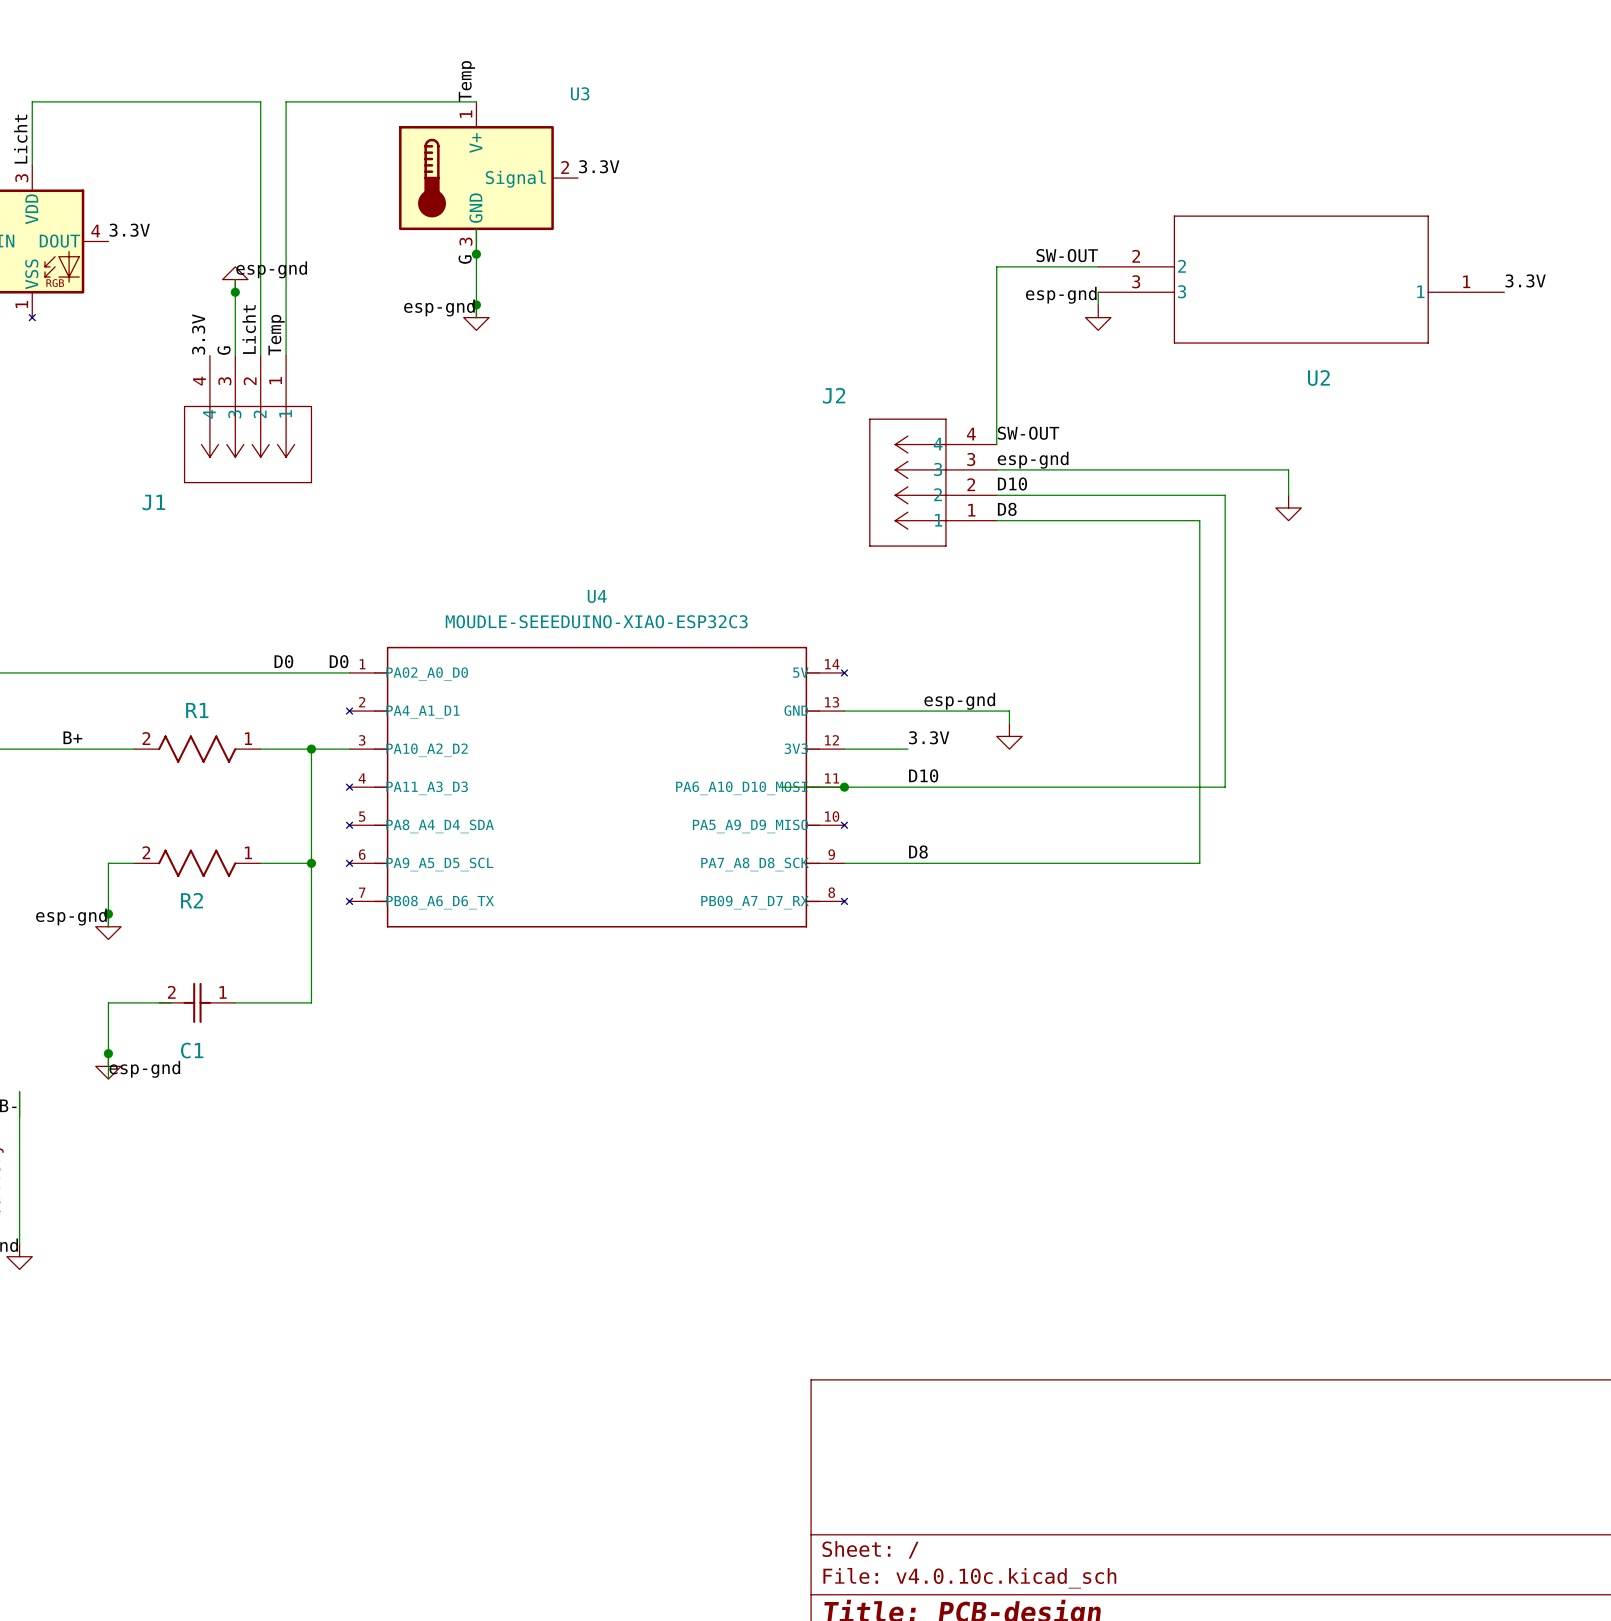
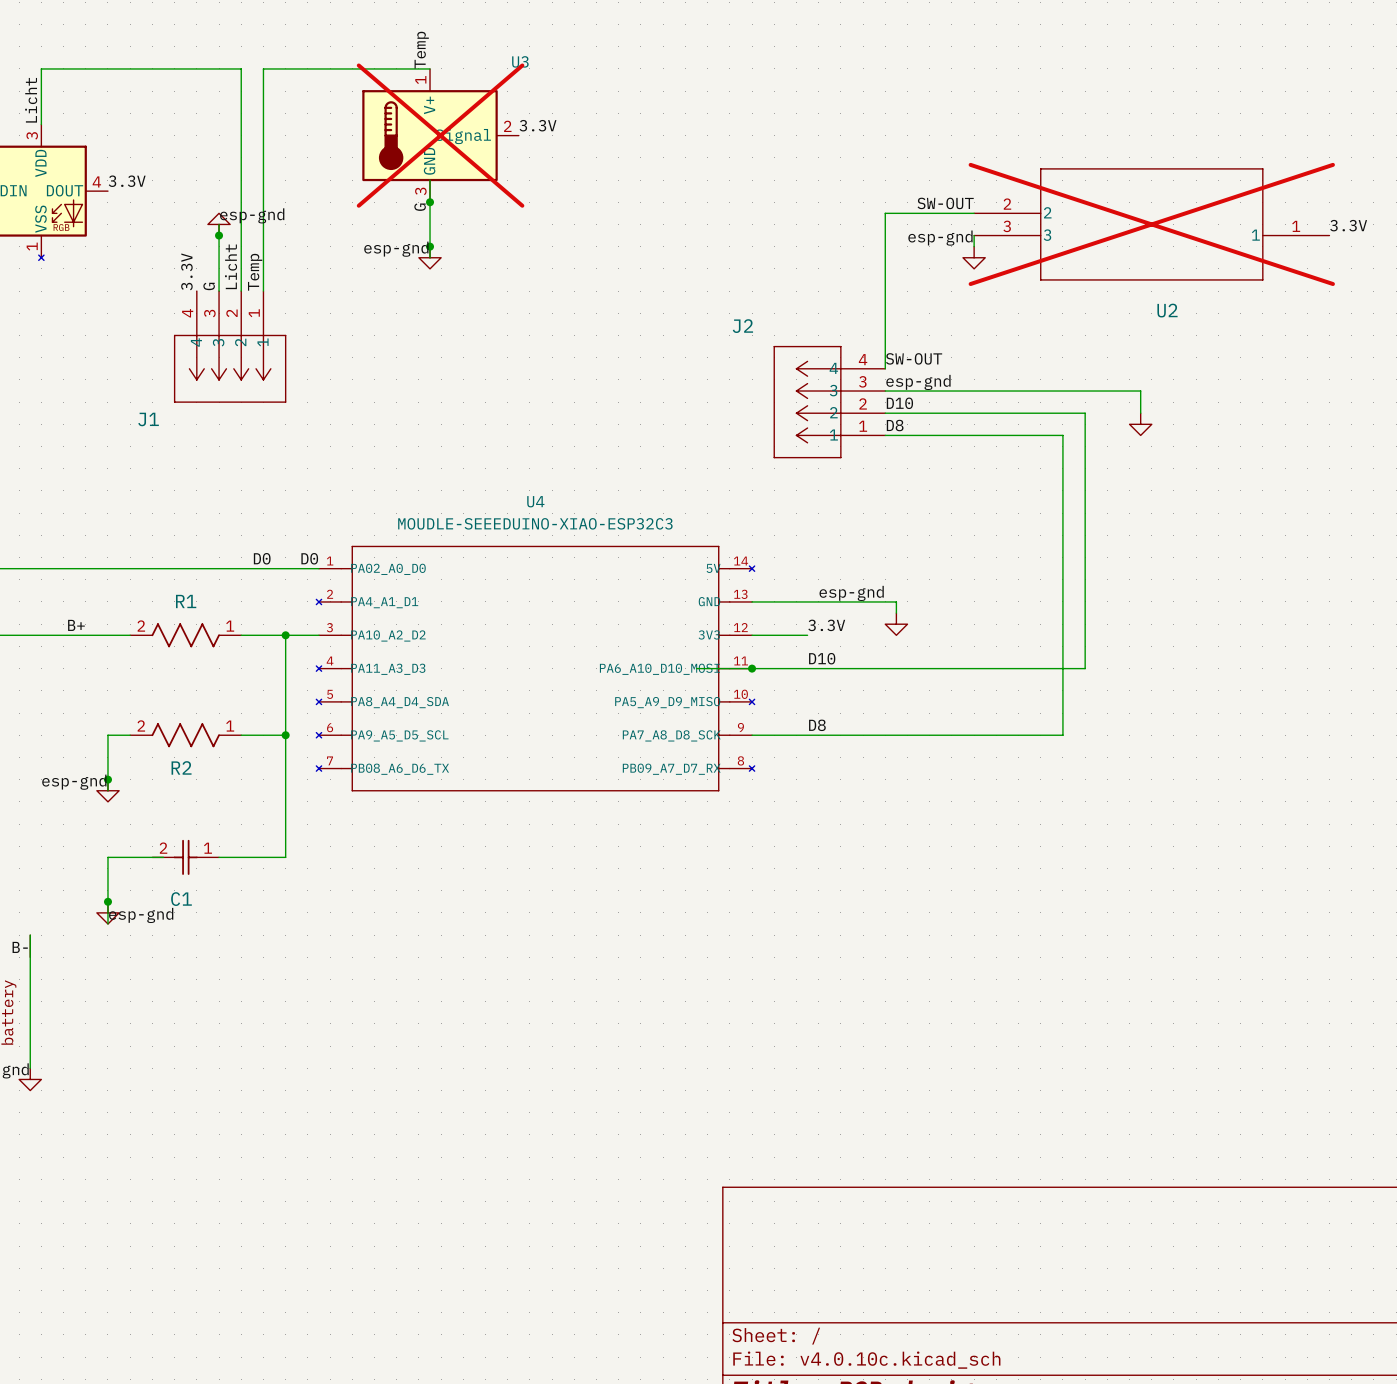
U3 do-not-place cross: none -> (440, 135)
U2 do-not-place cross: none -> (1151, 224)

